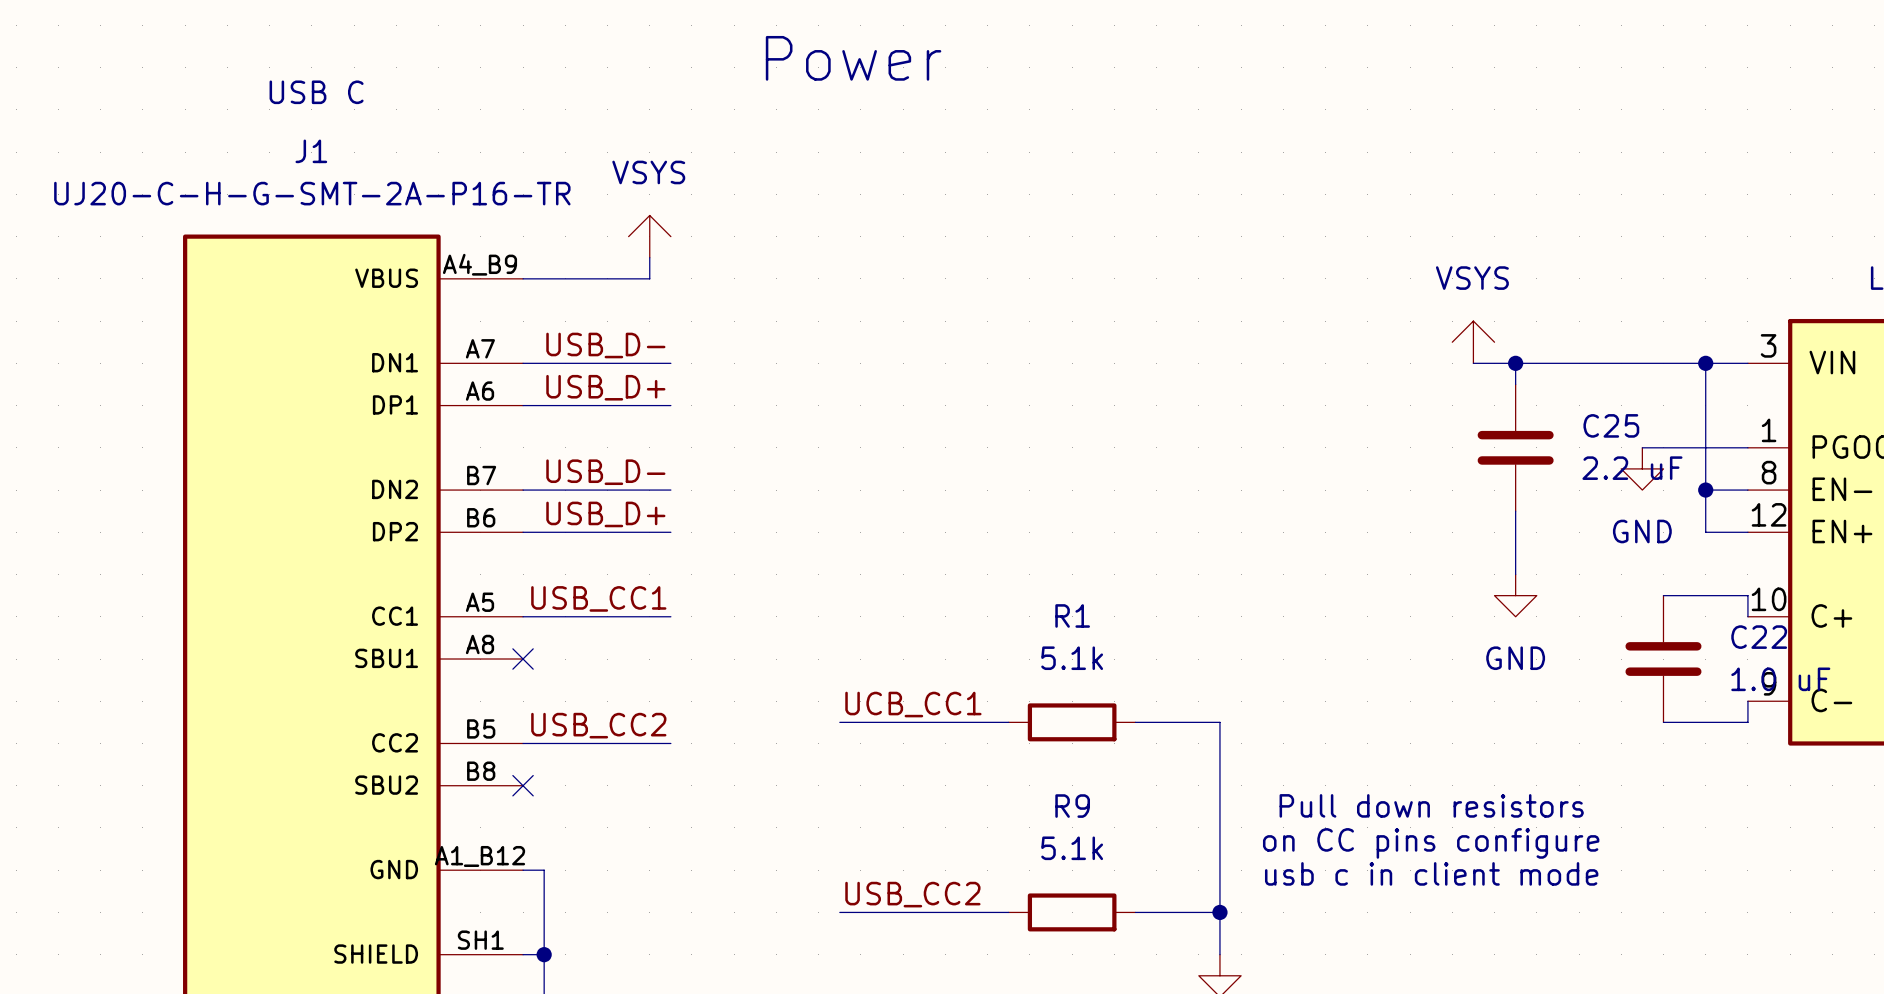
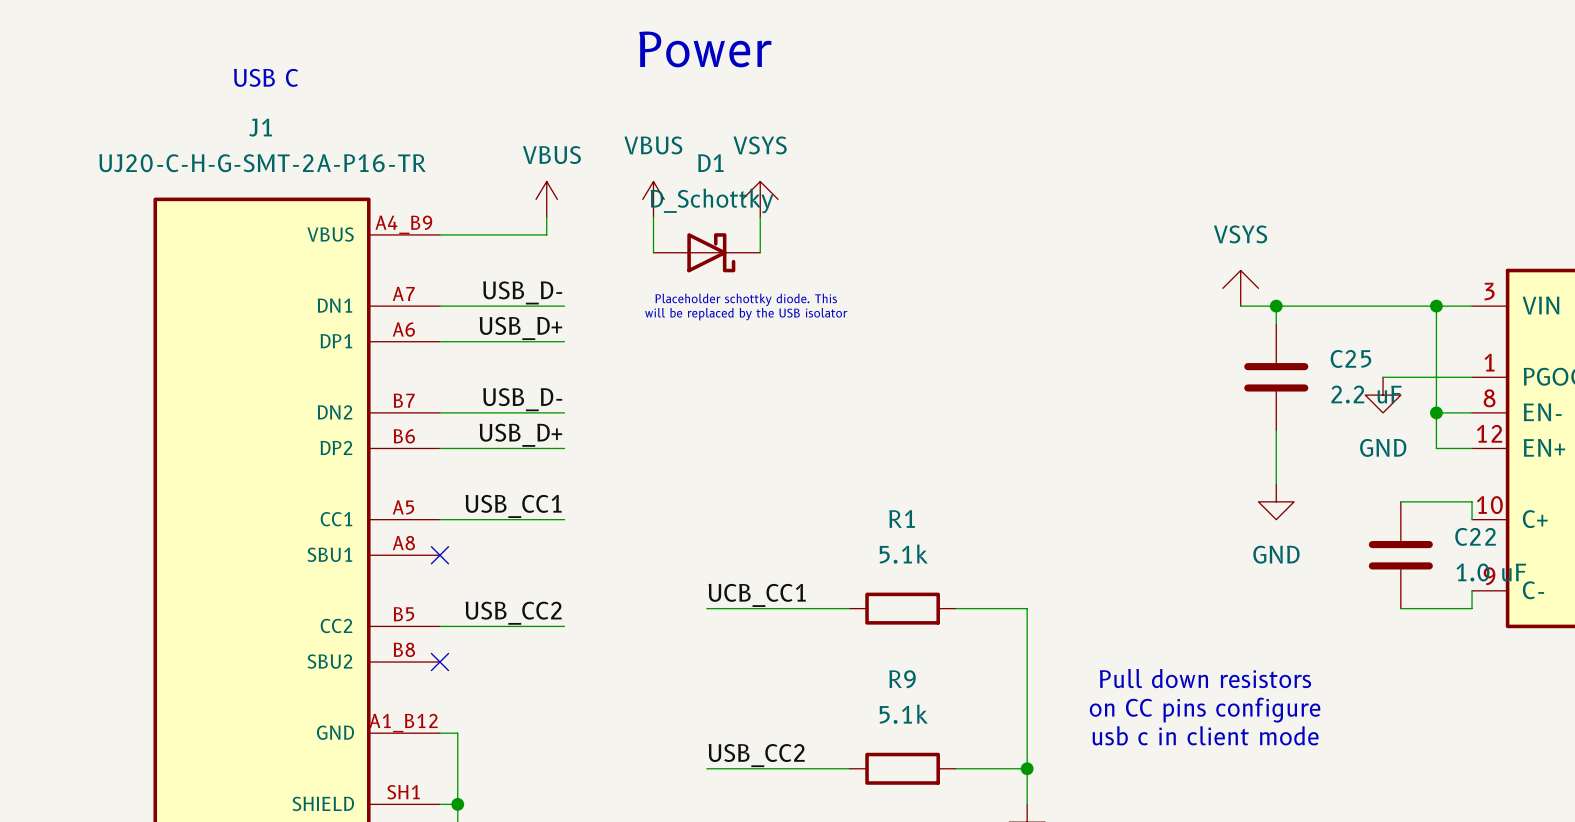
power symbol: VSYS (649, 236) -> VBUS (546, 199)
power symbol: none -> VBUS (653, 199)
power symbol: none -> VSYS (760, 199)
wire: none -> (653, 217) (653, 252)
wire: none -> (760, 217) (760, 252)
D1: none -> D_Schottky (706, 252)
text: none -> Placeholder schottky diode. This (746, 299)
text: none -> will be replaced by the USB isolator (746, 314)

